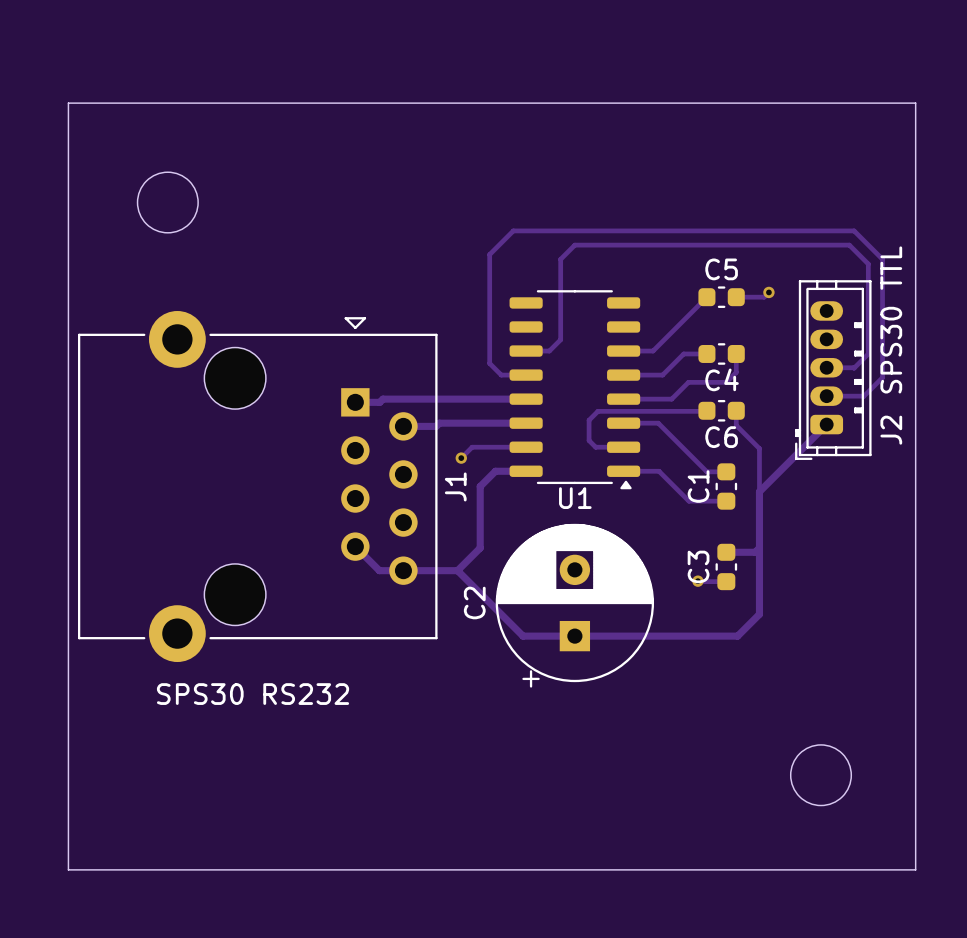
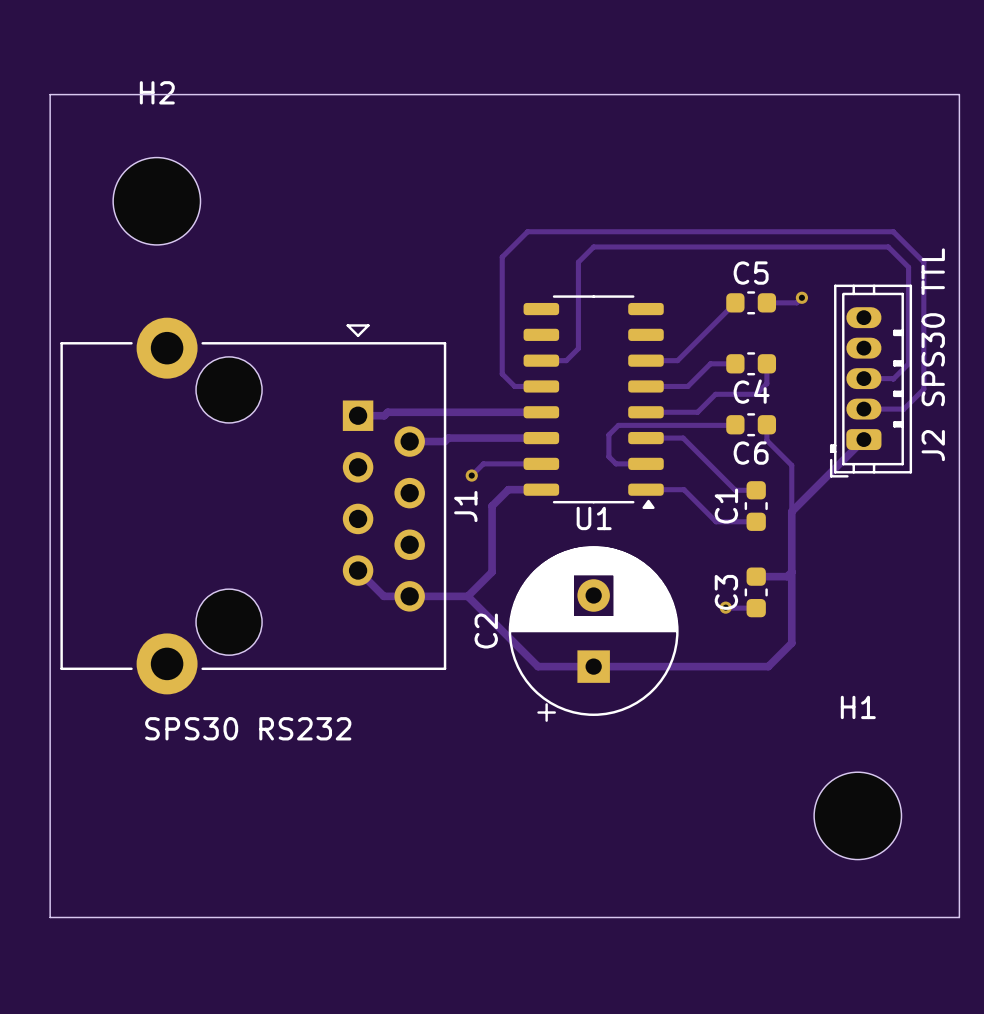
round board edge: [137, 171, 199, 234] -> none
H2: none -> (156, 201)
round board edge: [790, 744, 852, 806] -> none
H1: none -> (857, 815)

